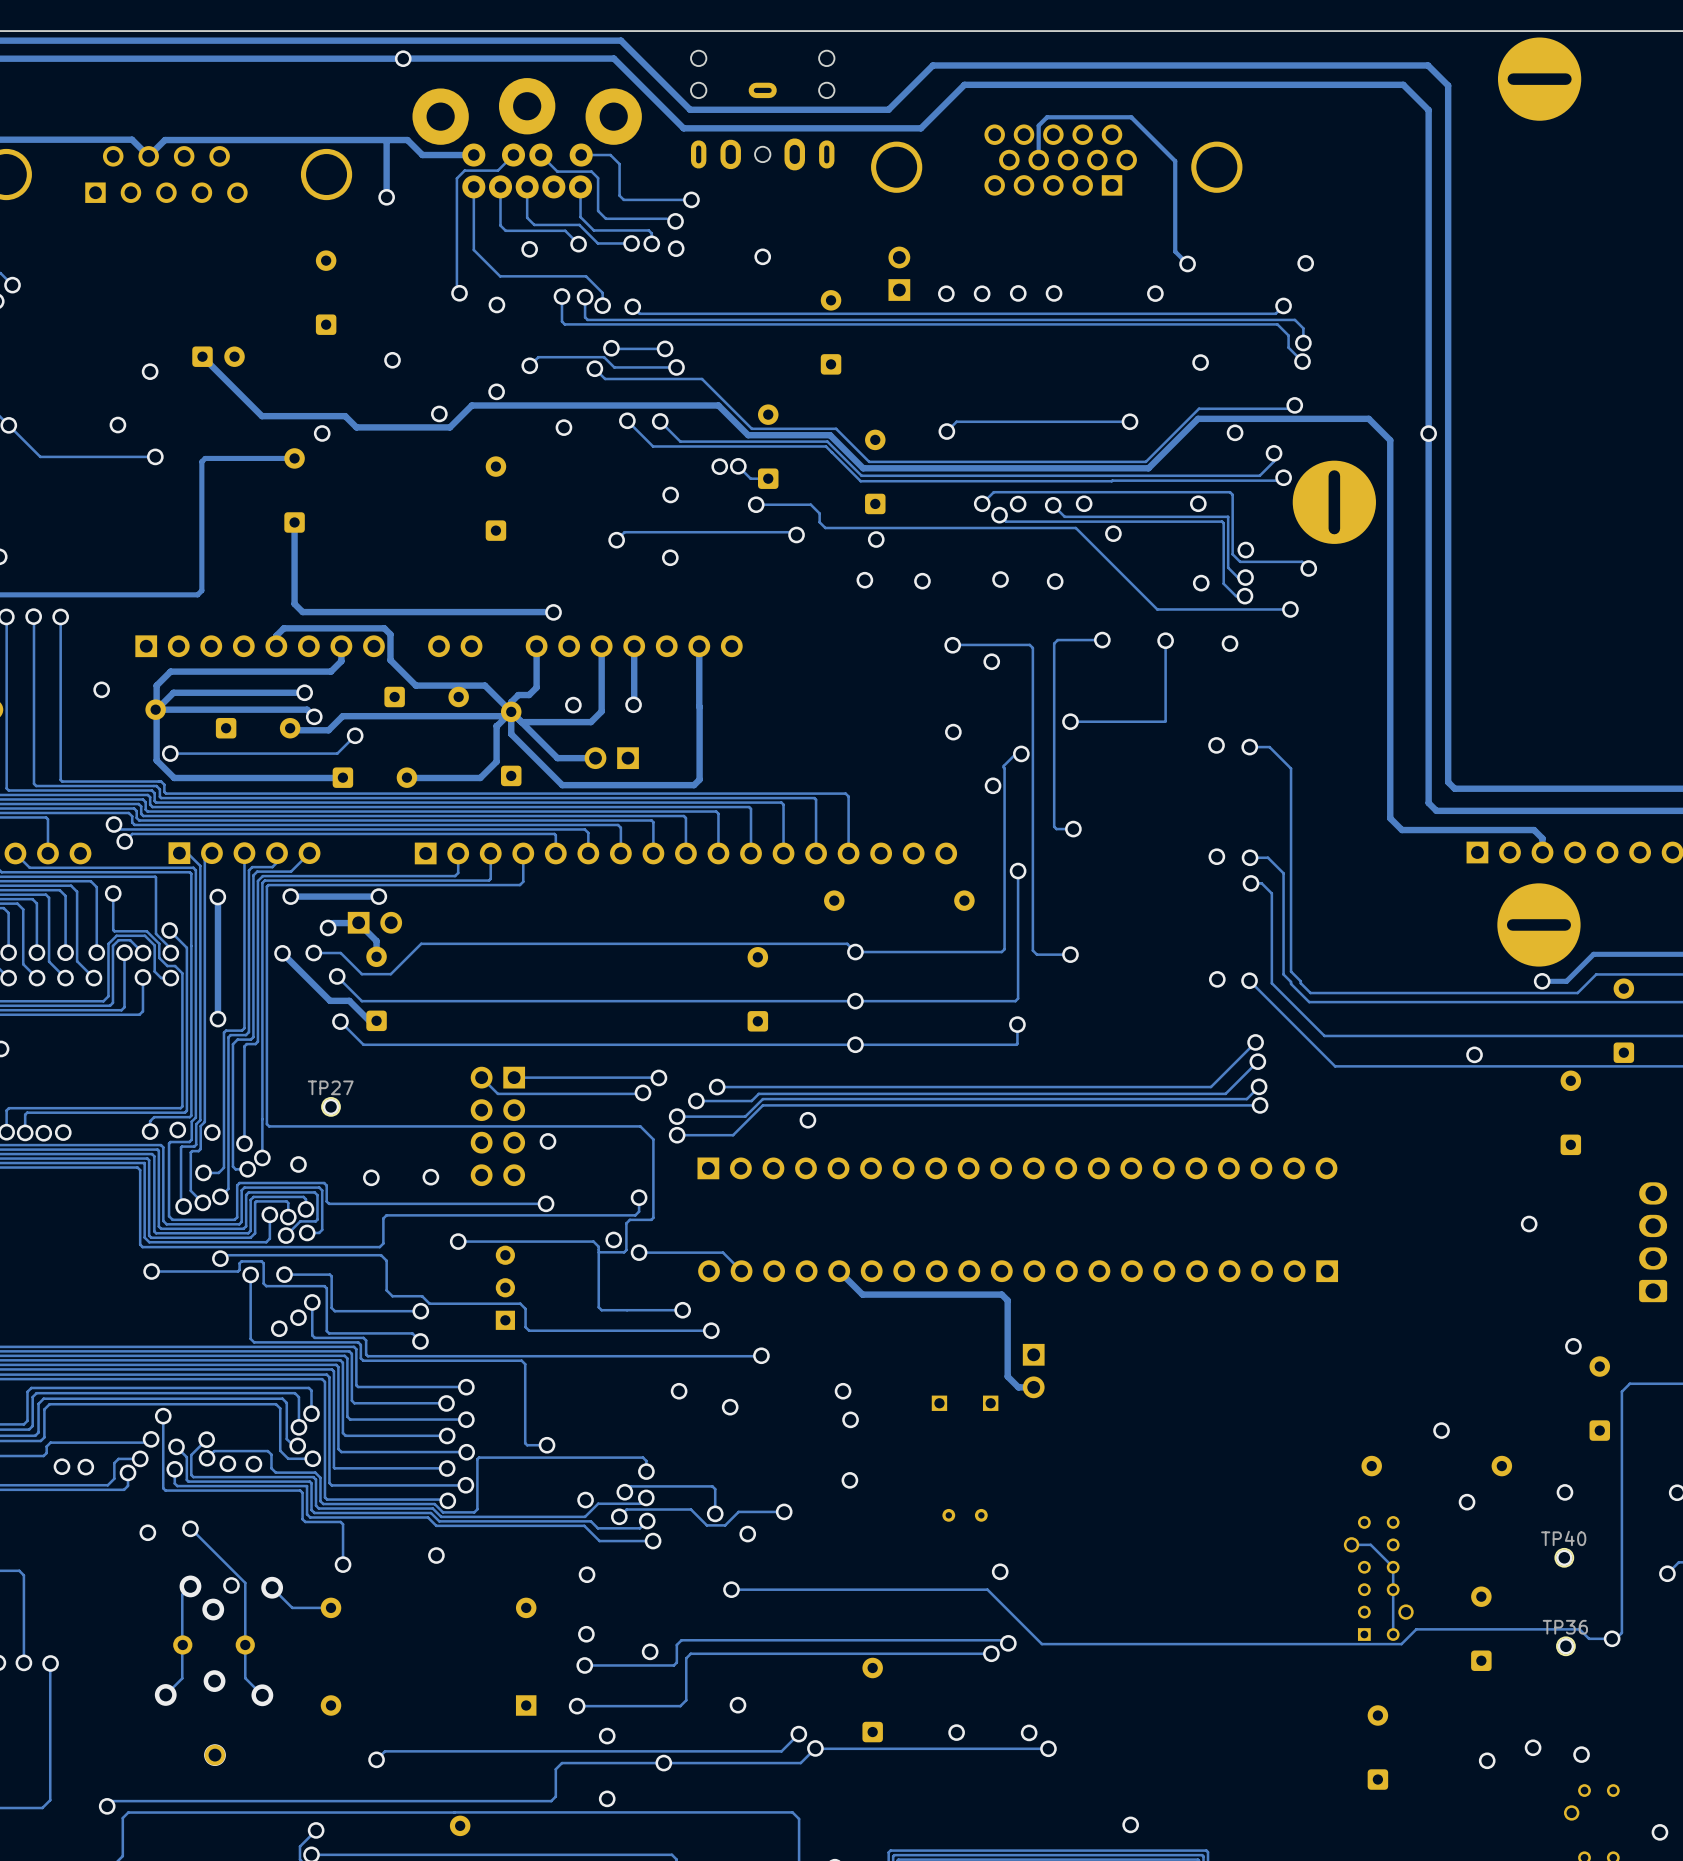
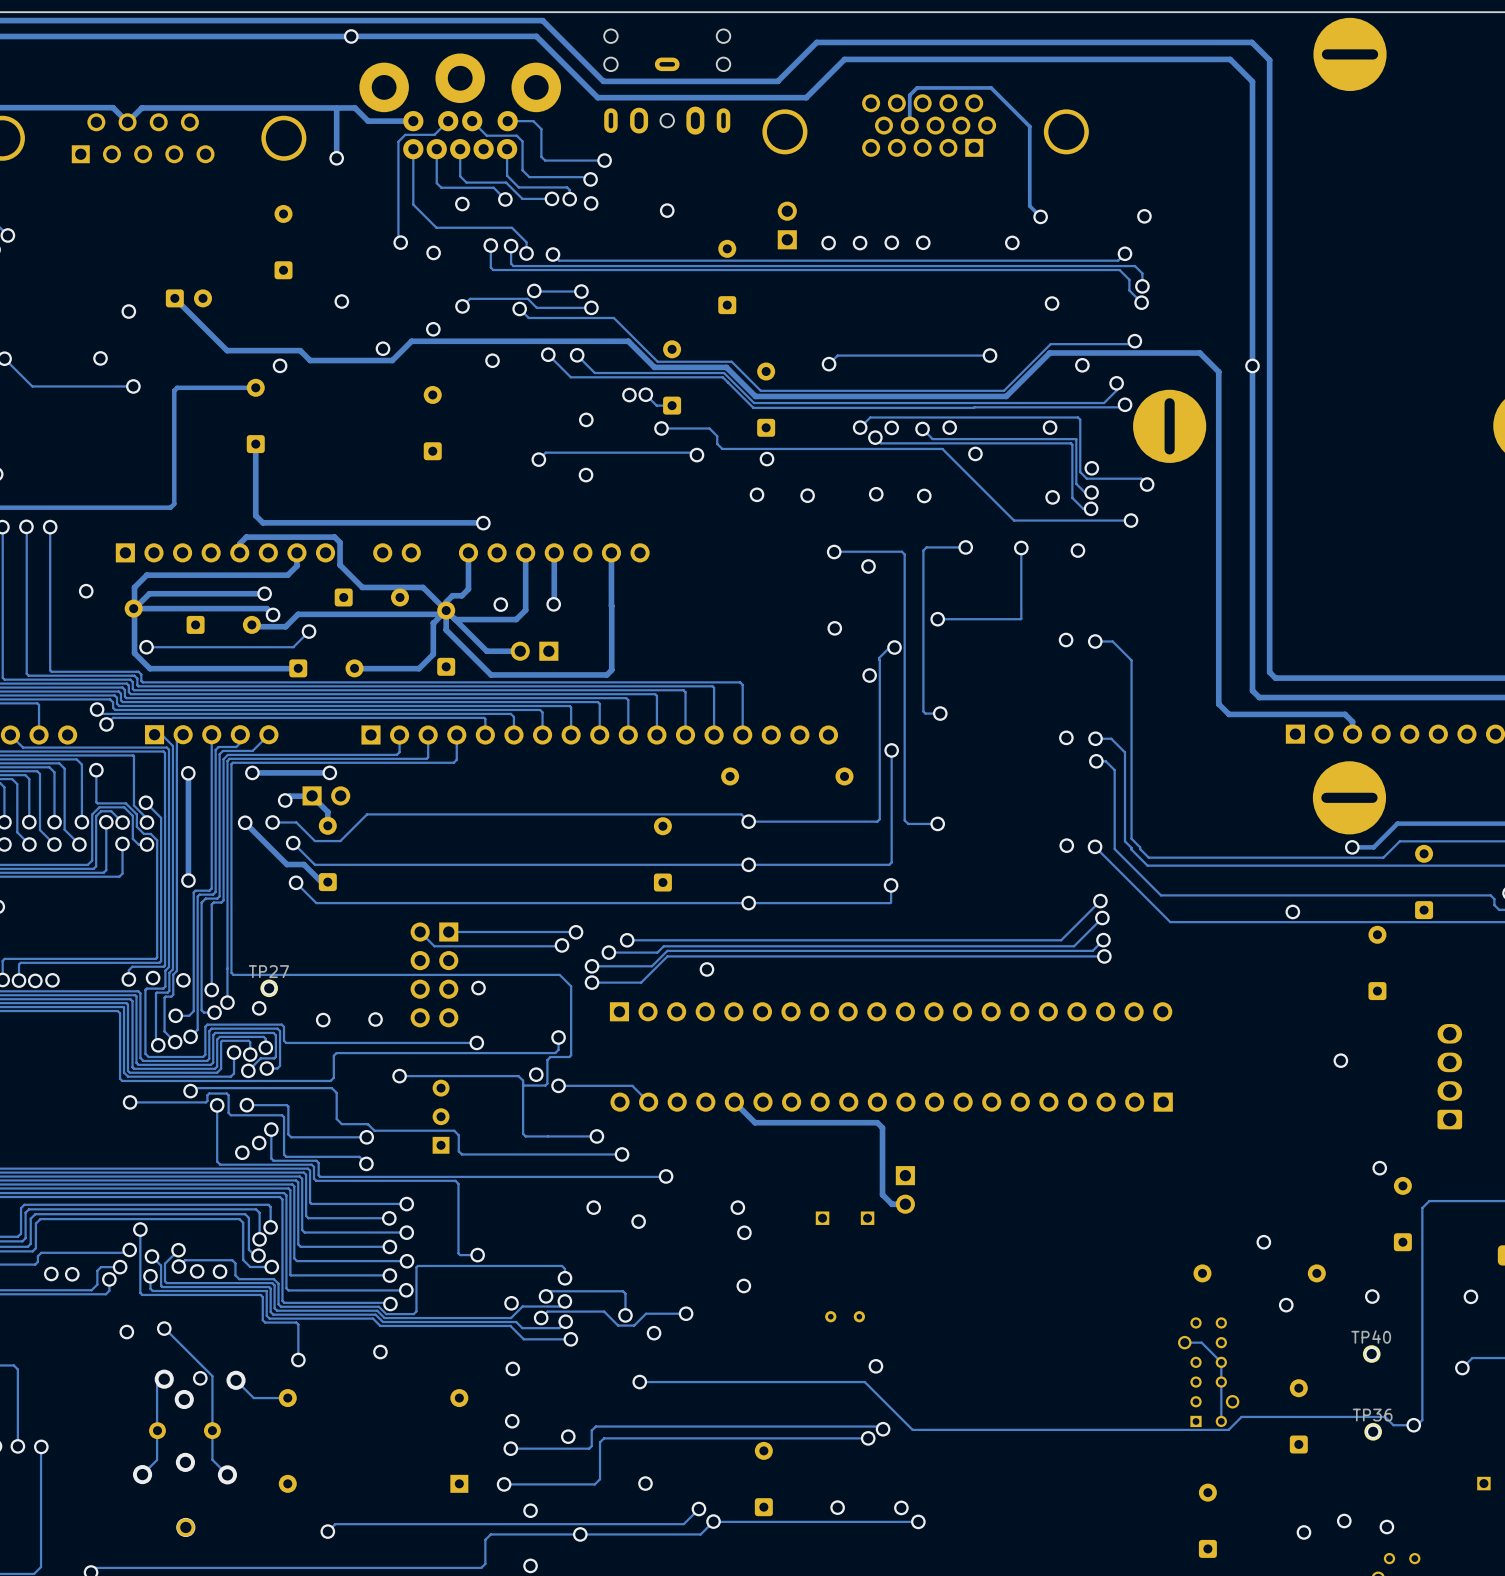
TP27 position: (331, 1106) -> (269, 988)
via position: (331, 1106) -> (269, 988)

